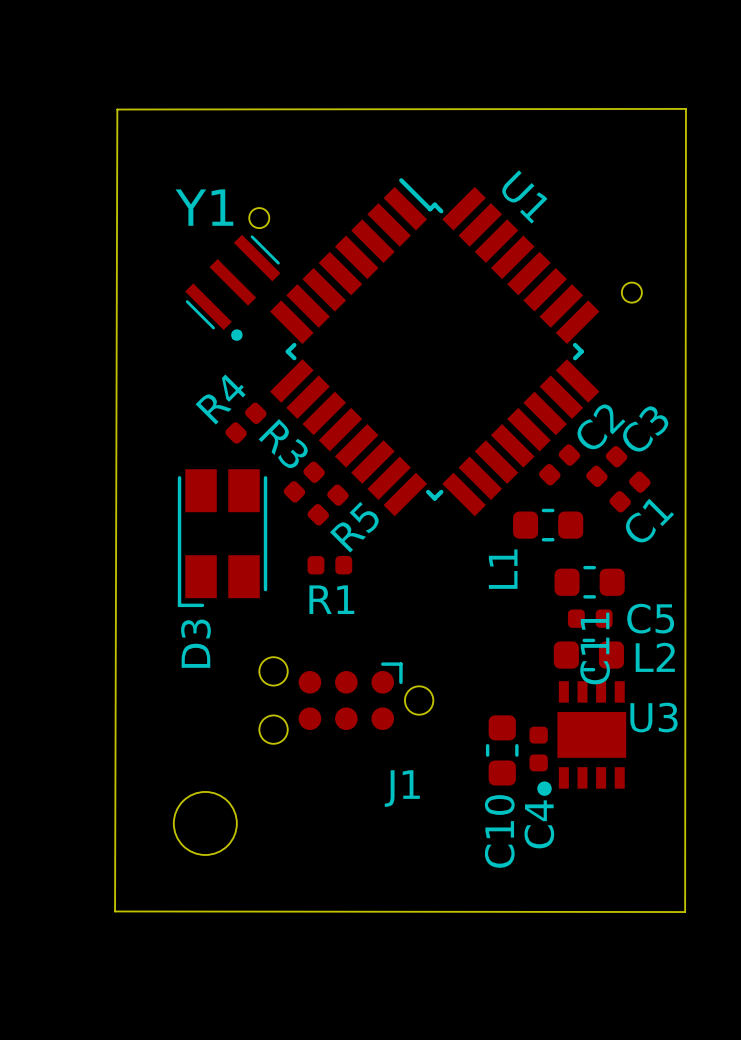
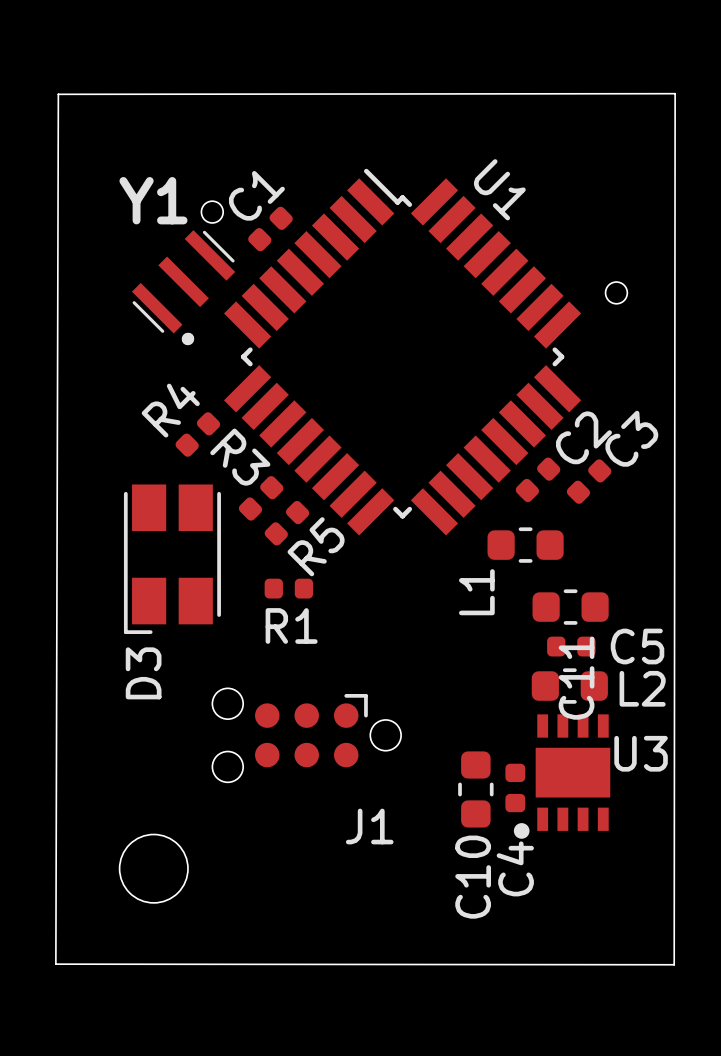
C1 position: (630, 491) -> (270, 228)
C1 name position: C1 (649, 520) -> C1 (256, 195)

